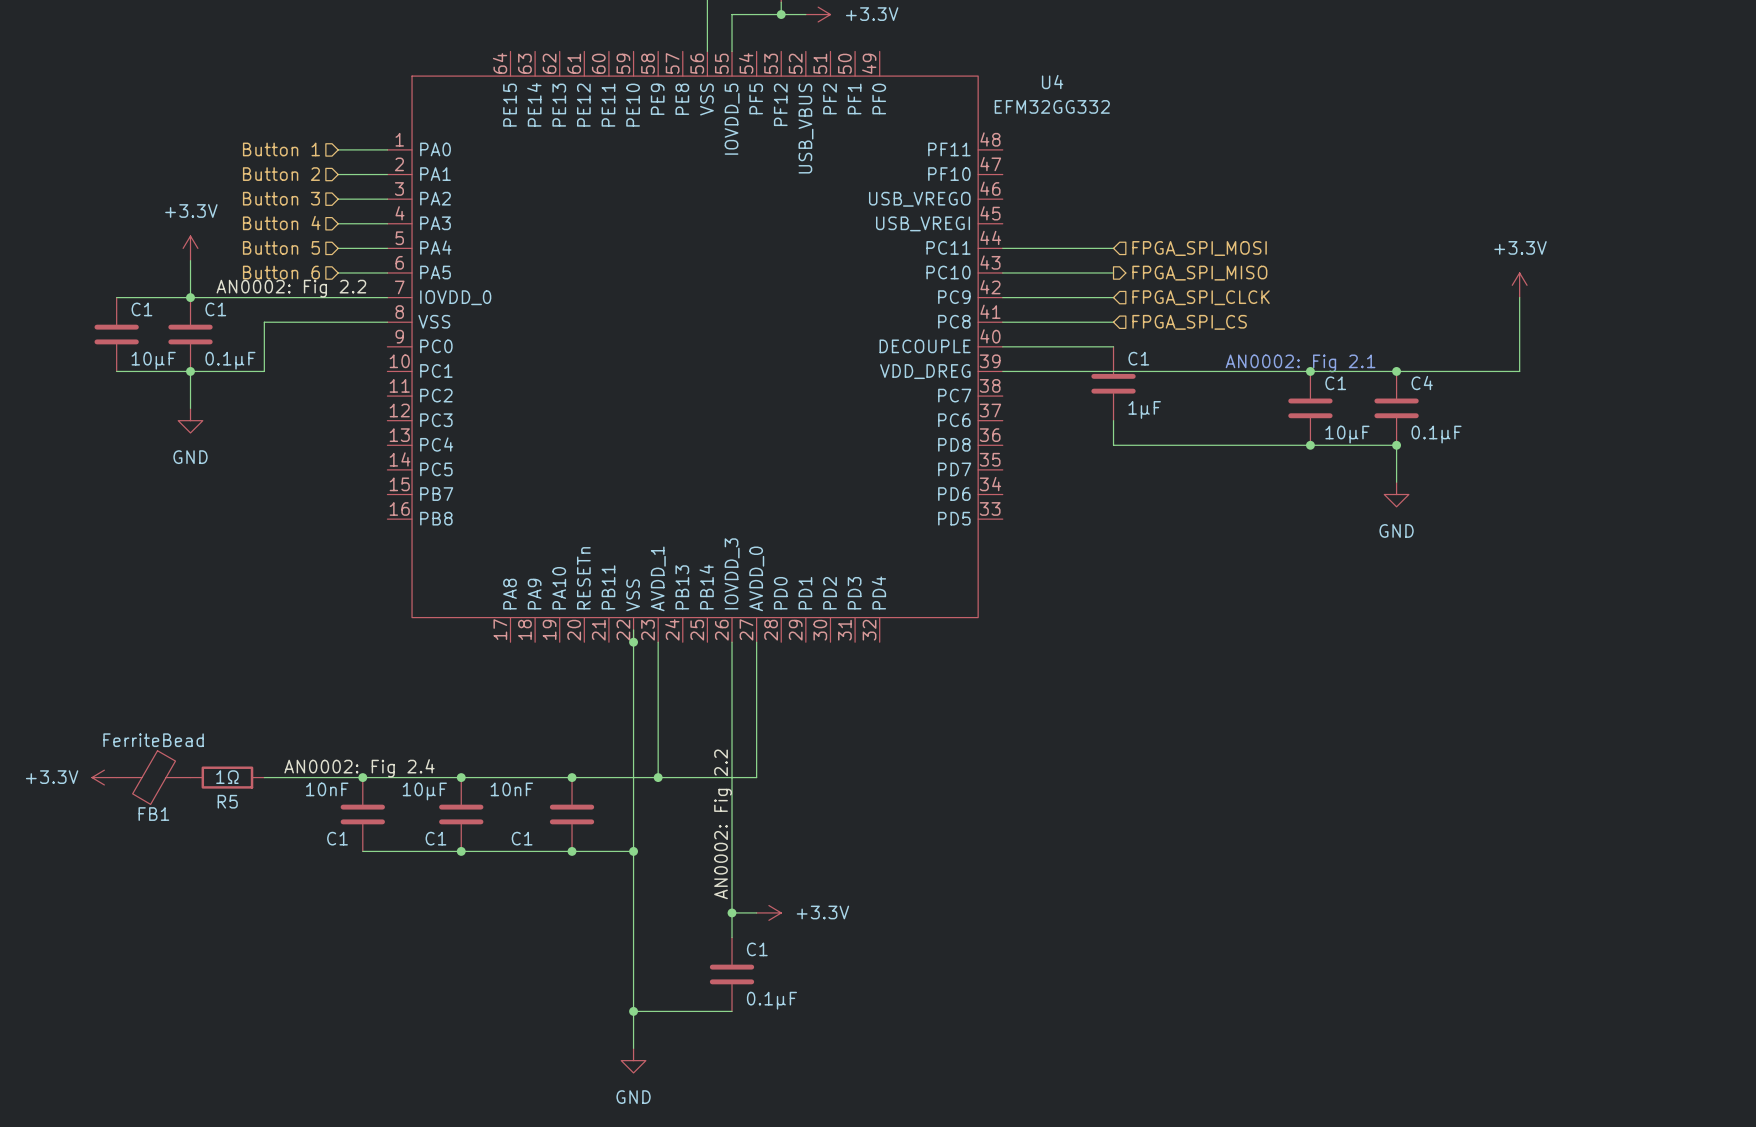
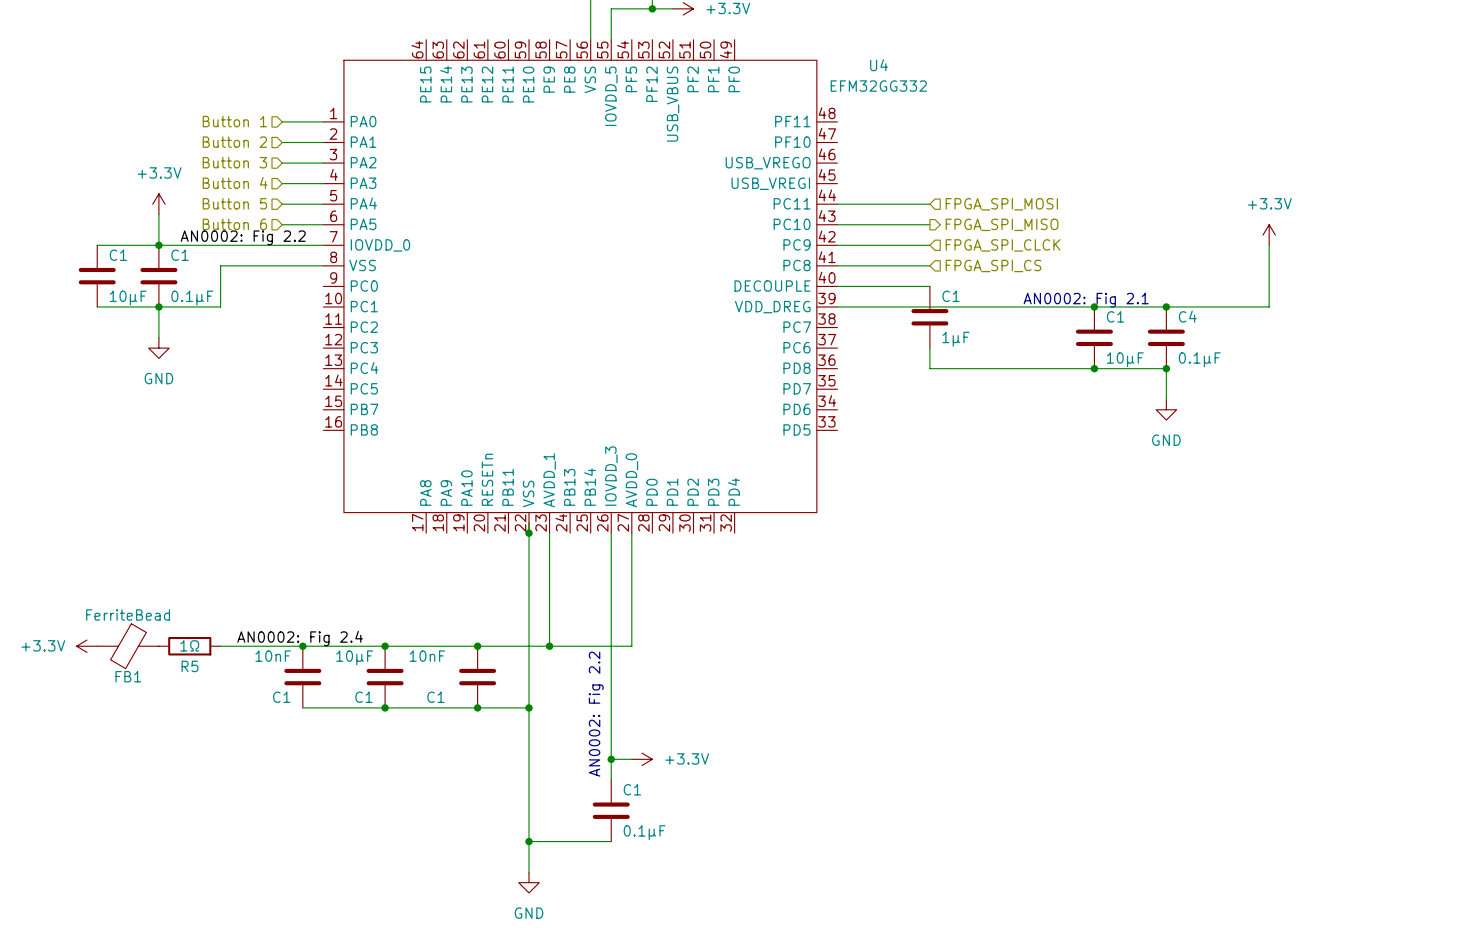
label: AN0002: Fig 2.2 (723, 824) -> none
text: none -> AN0002: Fig 2.2 (596, 714)

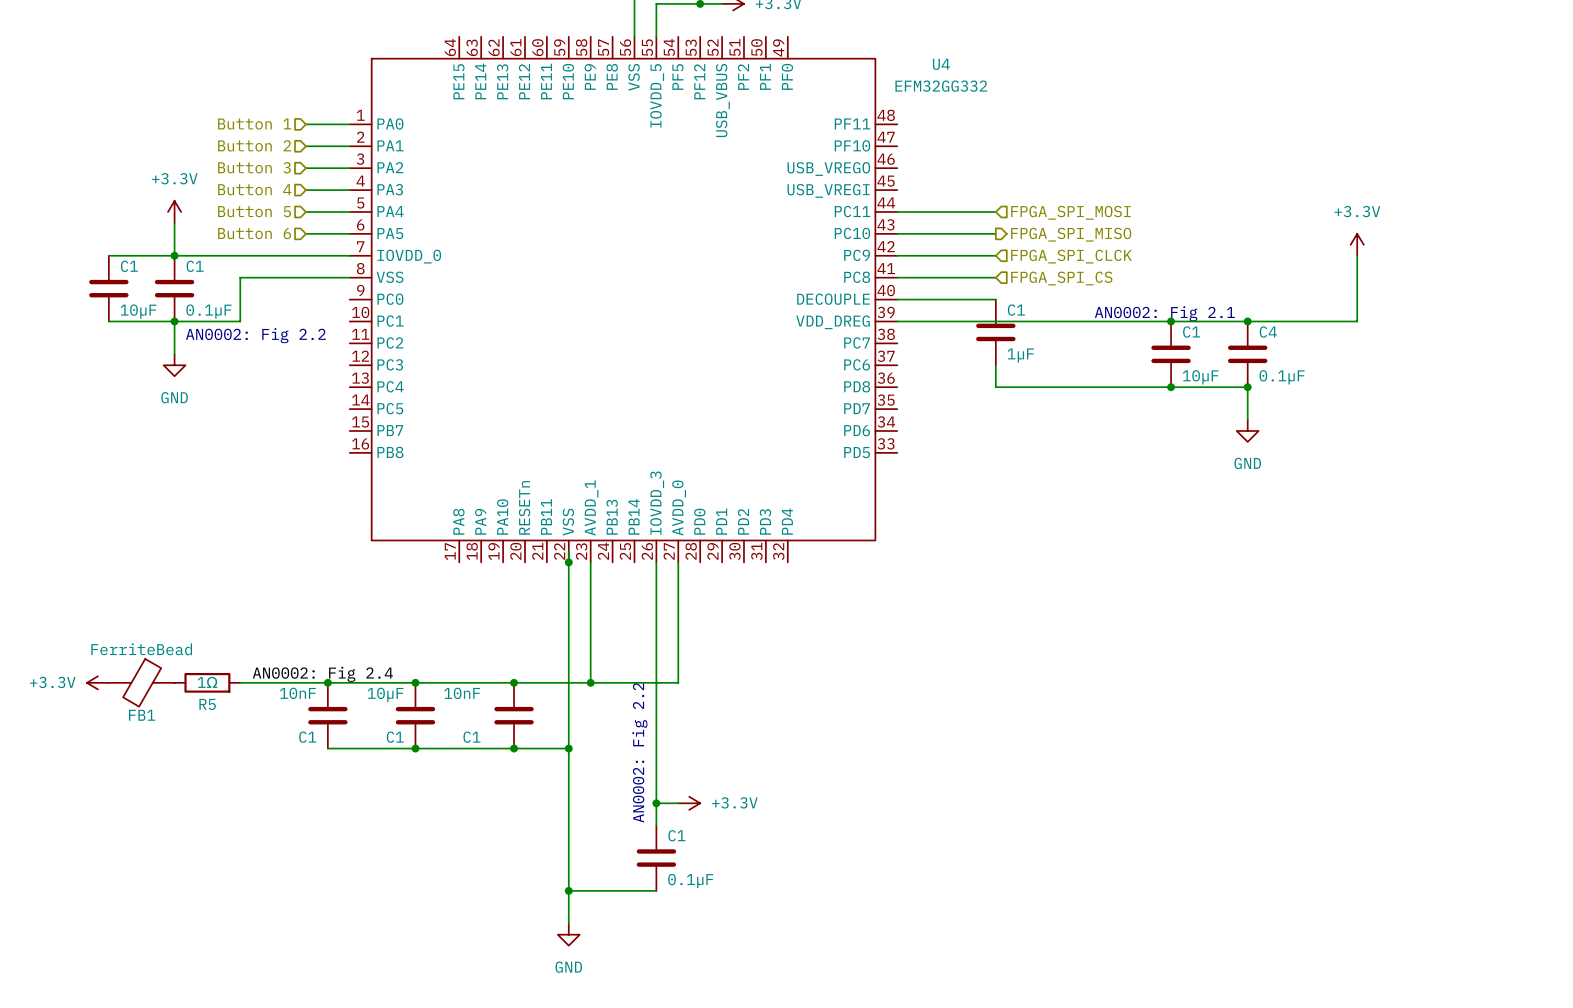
label: AN0002: Fig 2.2 (243, 237) -> none
text: none -> AN0002: Fig 2.2 (255, 335)

